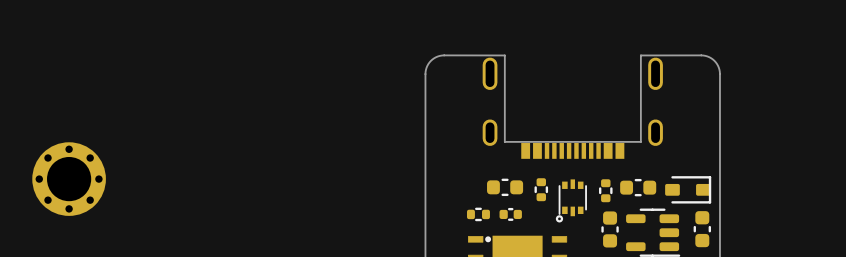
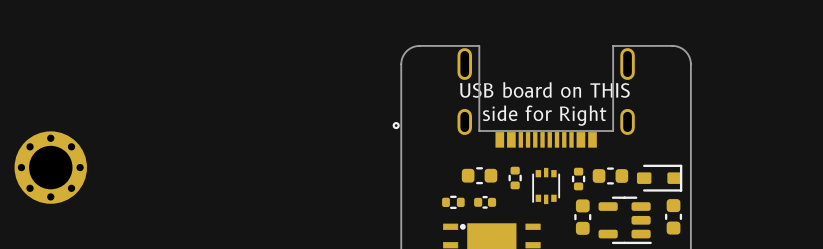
text: none -> USB board on THIS (544, 89)
text: none -> side for Right (544, 115)
drawing position: (559, 218) -> (396, 125)

